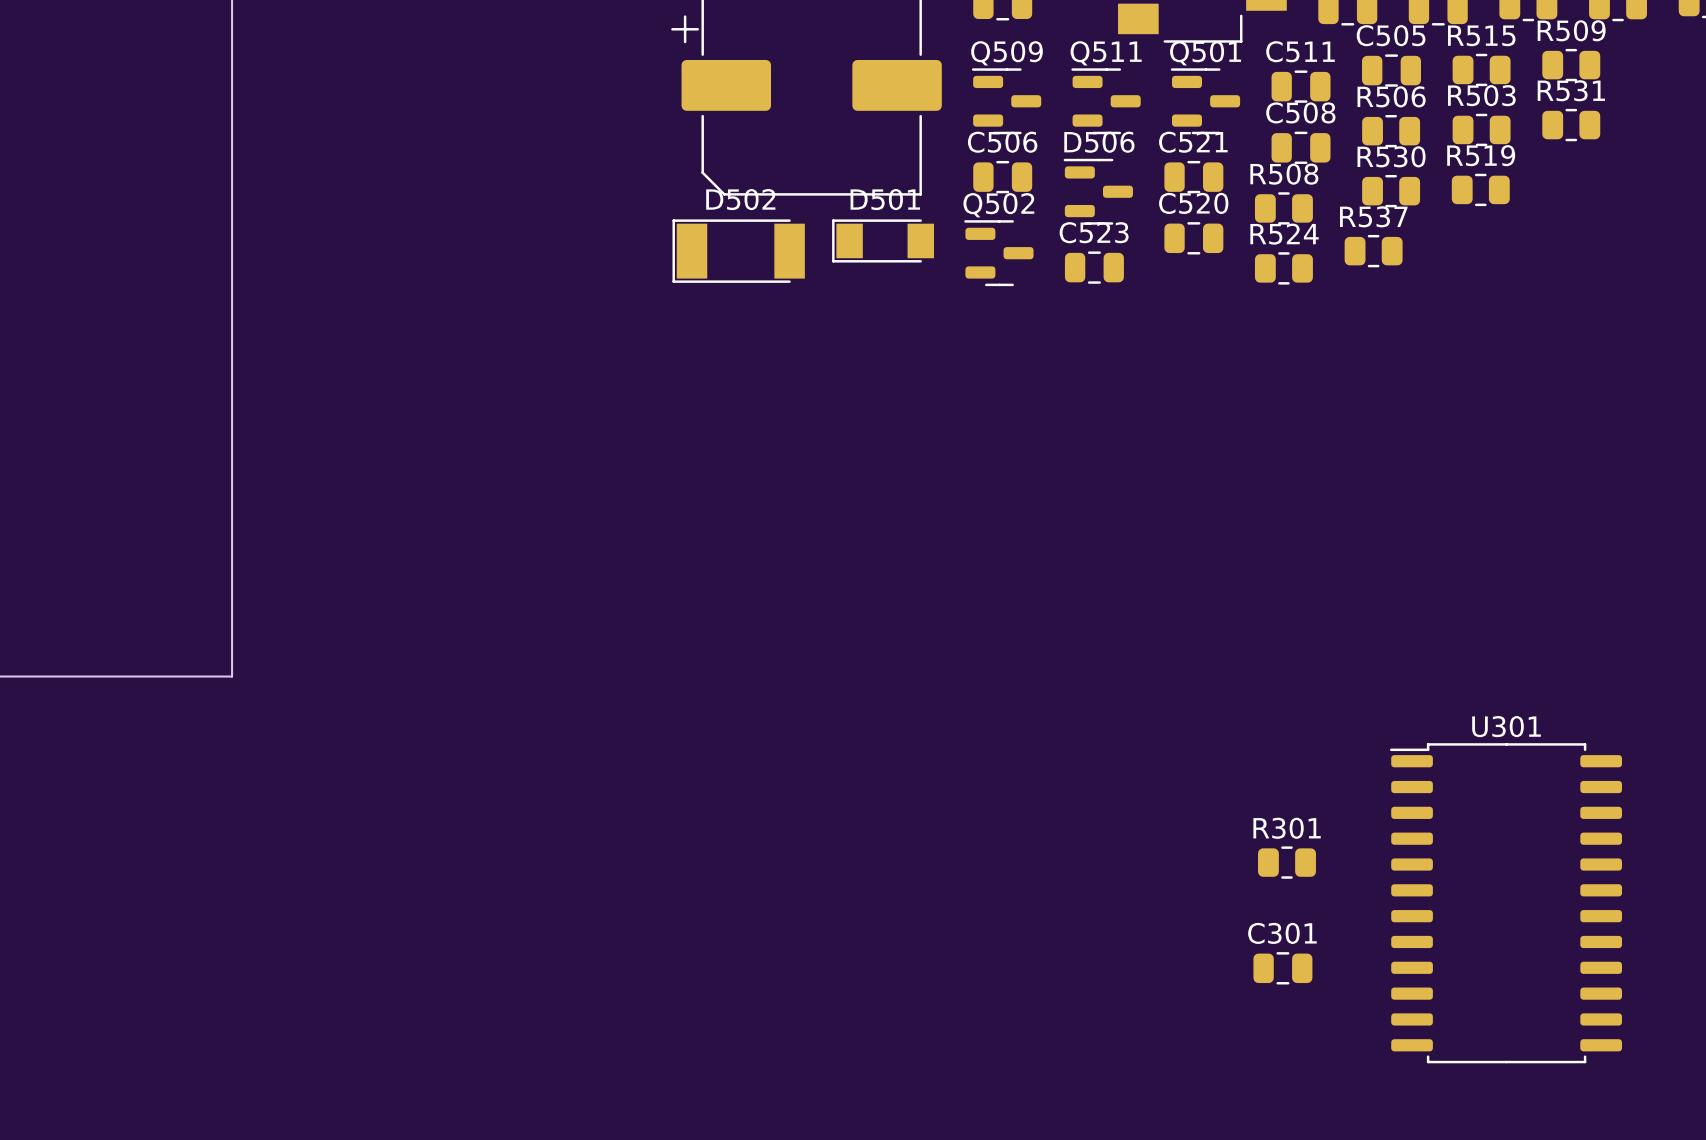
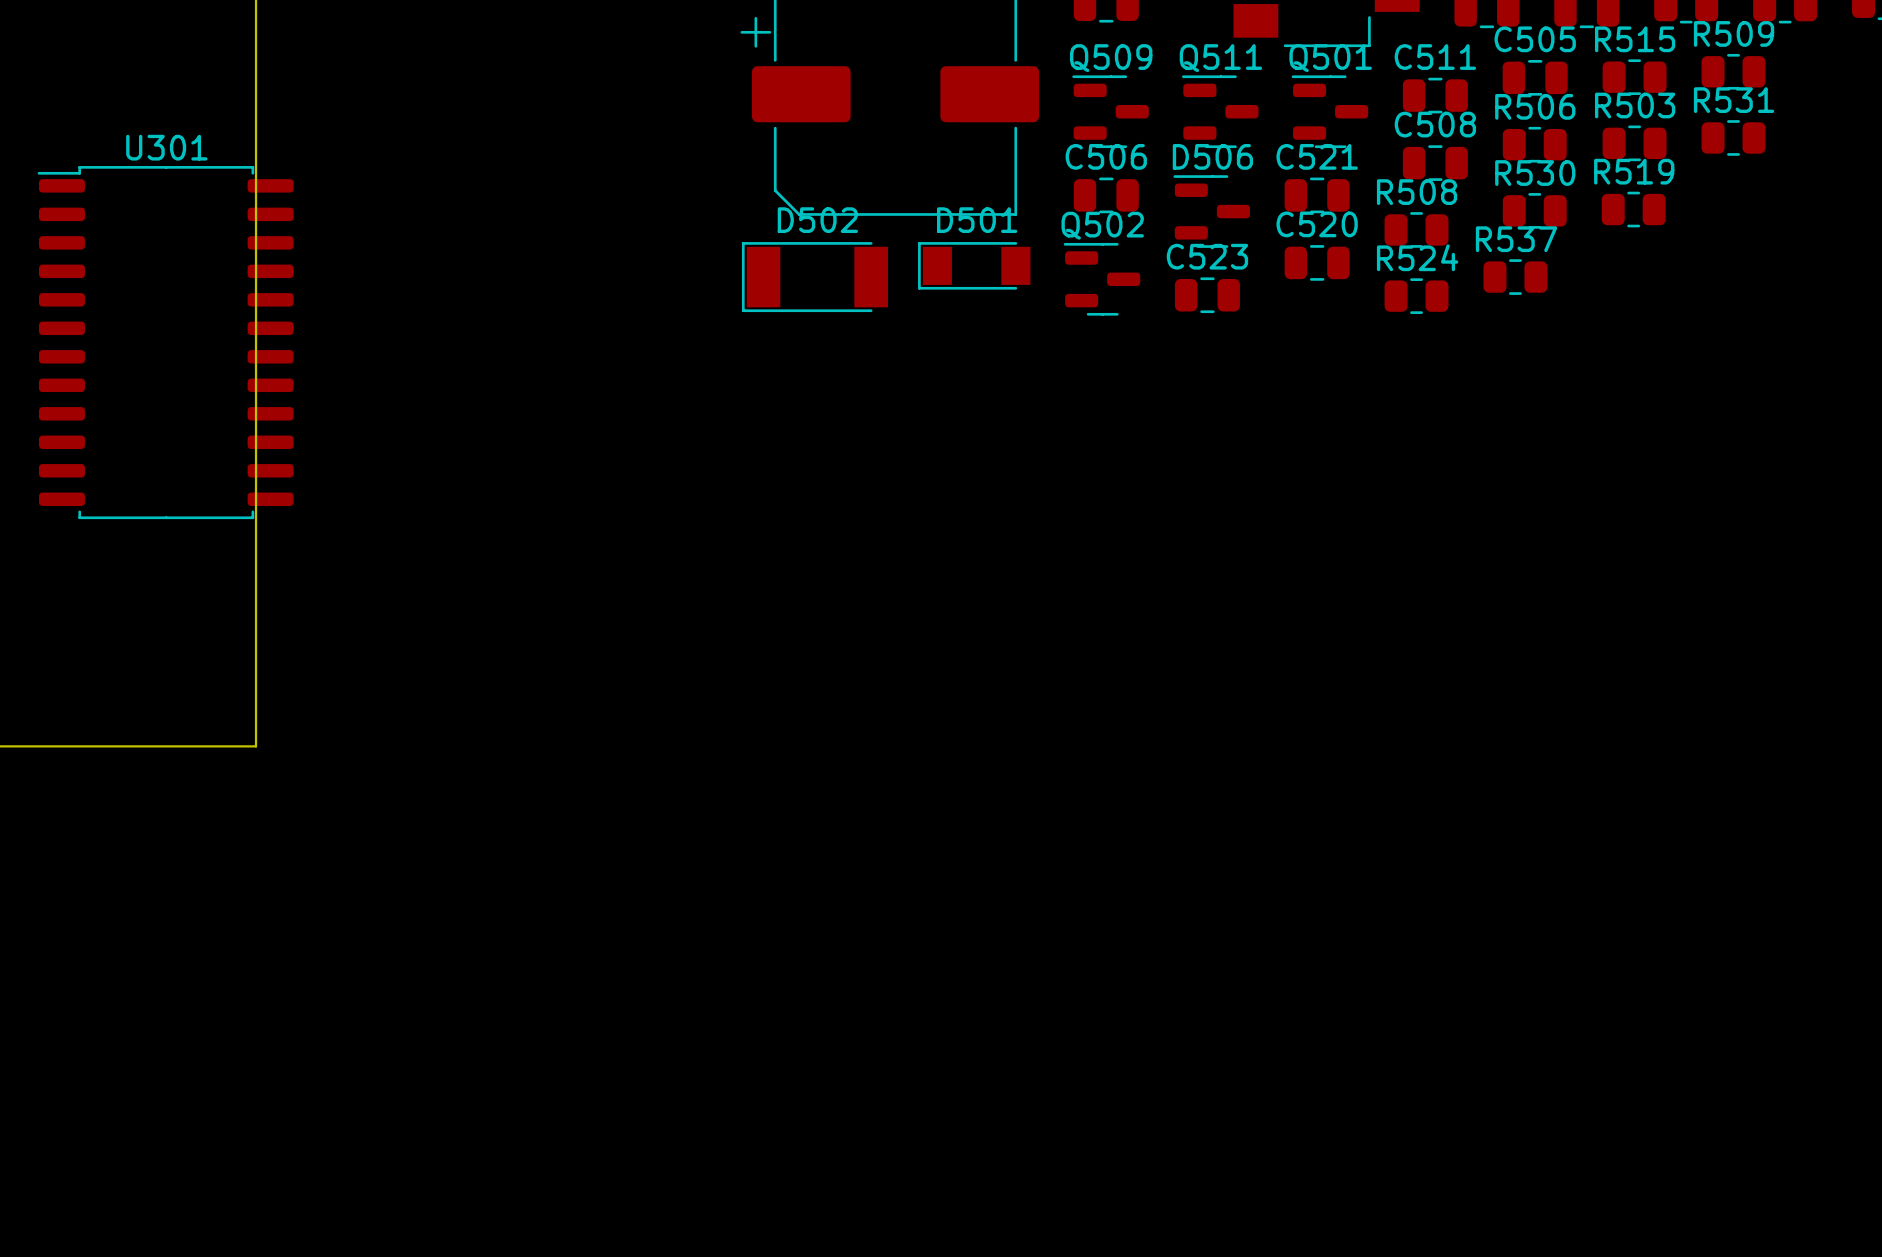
R301: (1286, 862) -> none
U301 position: (1505, 903) -> (165, 342)
C301: (1282, 968) -> none

